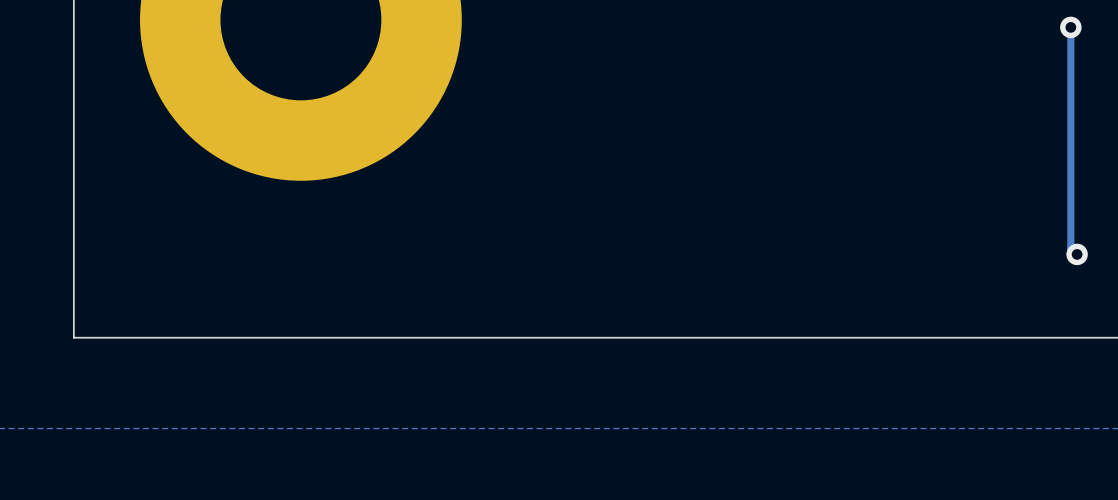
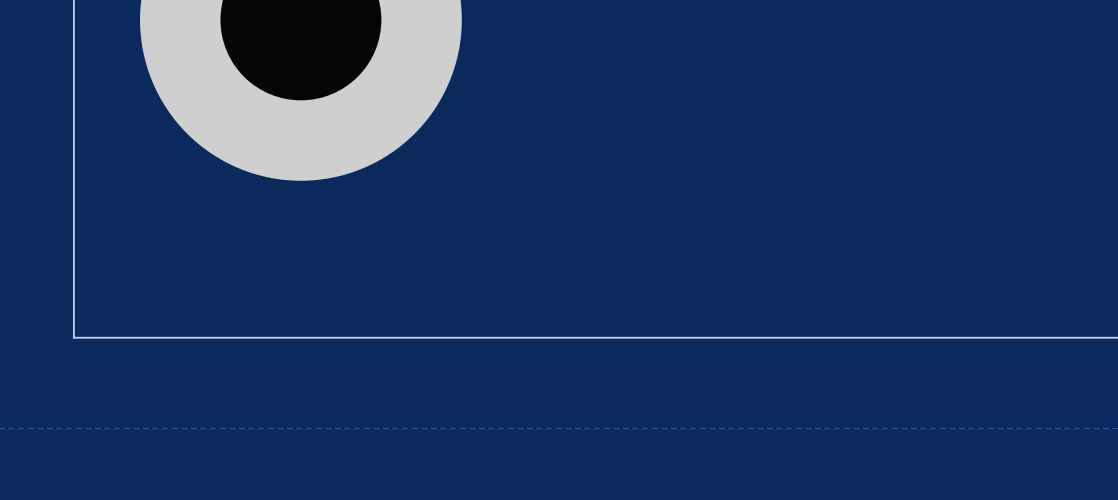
track: (1070, 27) (1070, 248) (1077, 254) -> none
via: (1070, 27) -> none
via: (1077, 254) -> none

